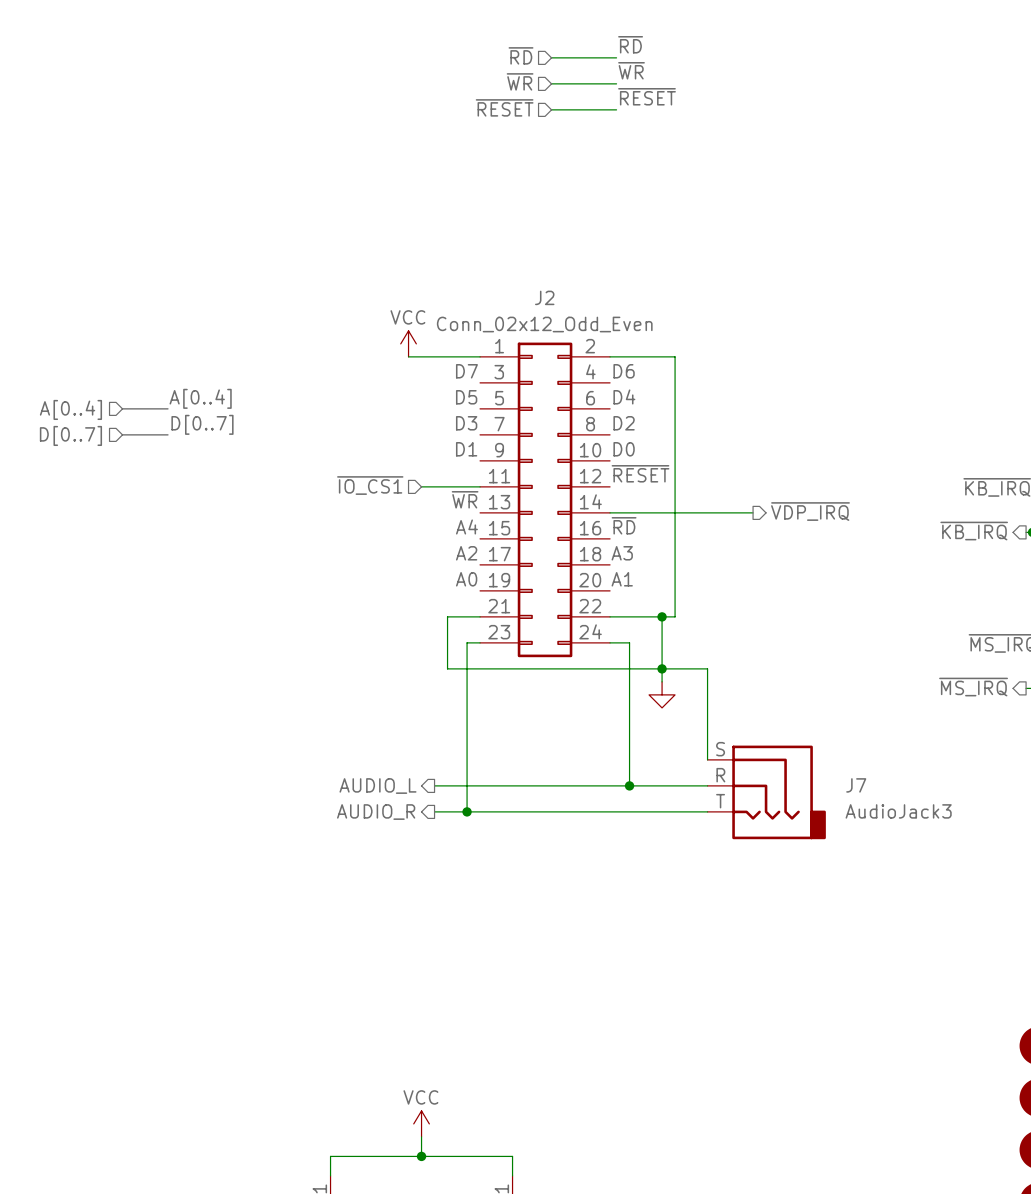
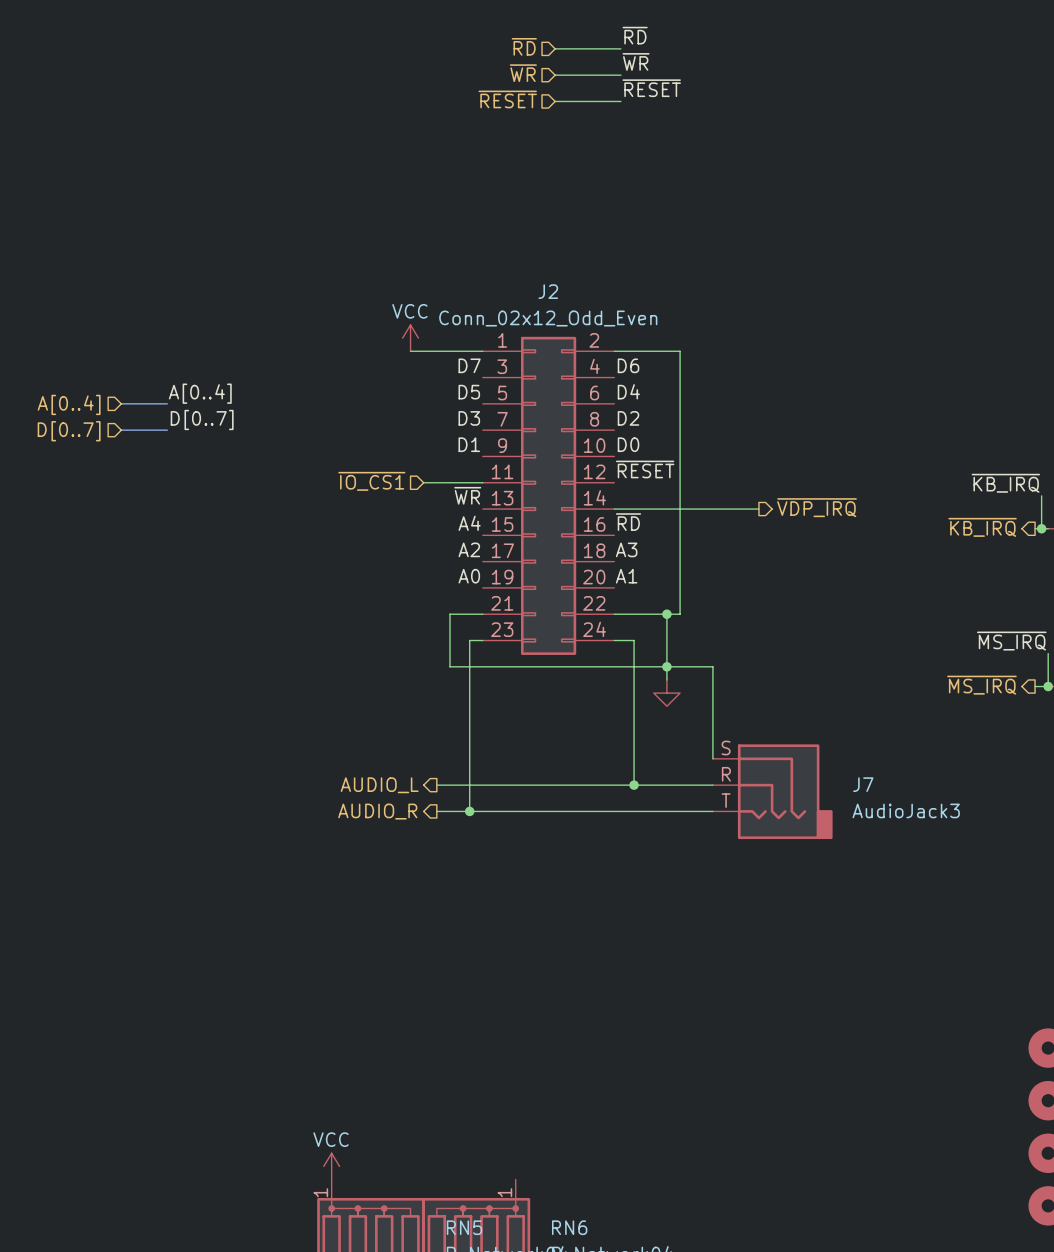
power symbol position: VCC (421, 1123) -> VCC (331, 1166)
wire: (421, 1136) (421, 1156) -> none
junction: (421, 1156) -> none
wire: (330, 1175) (330, 1156) (512, 1156) (512, 1175) -> none

